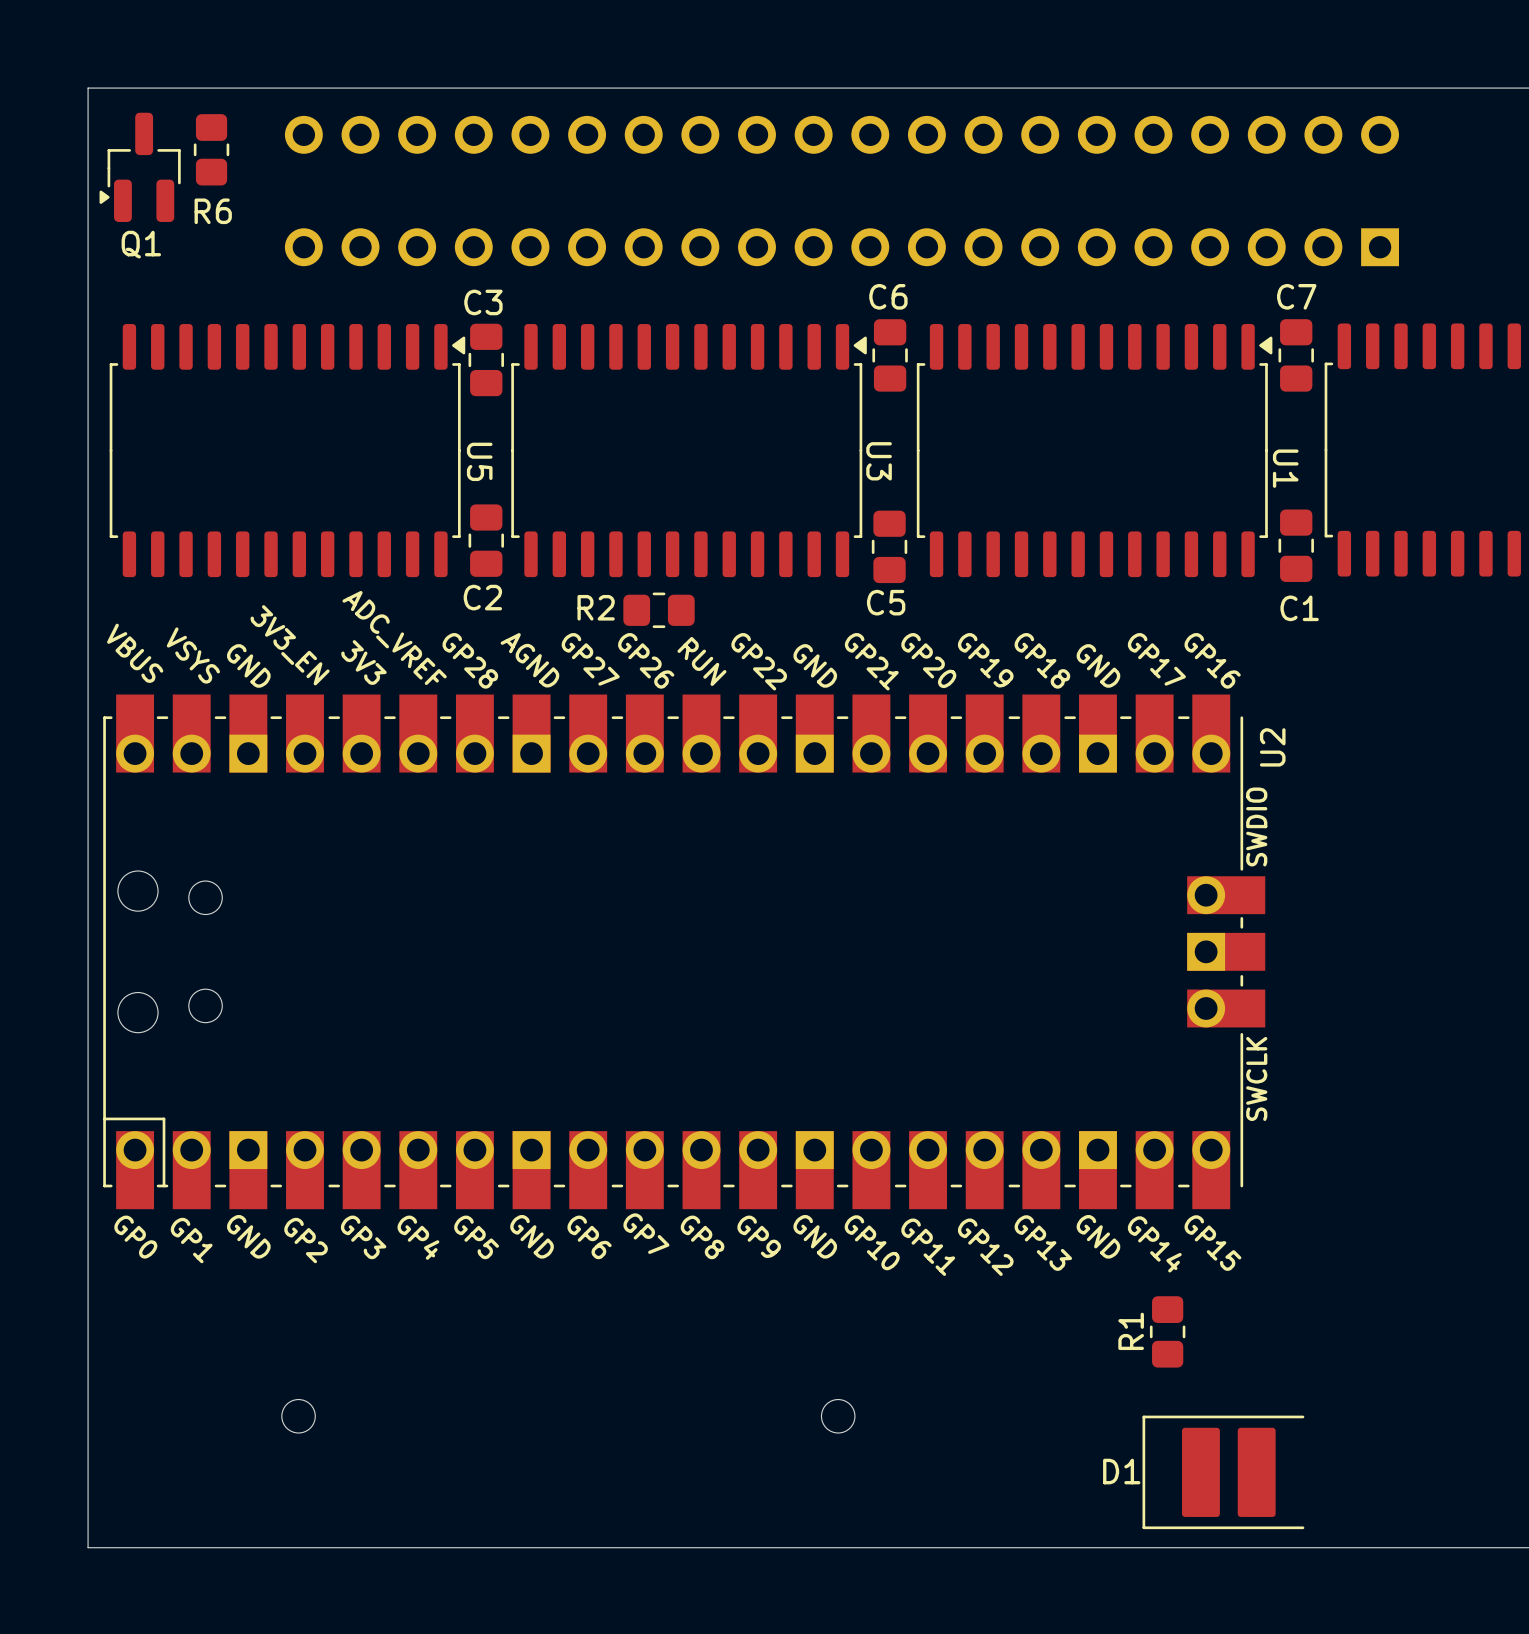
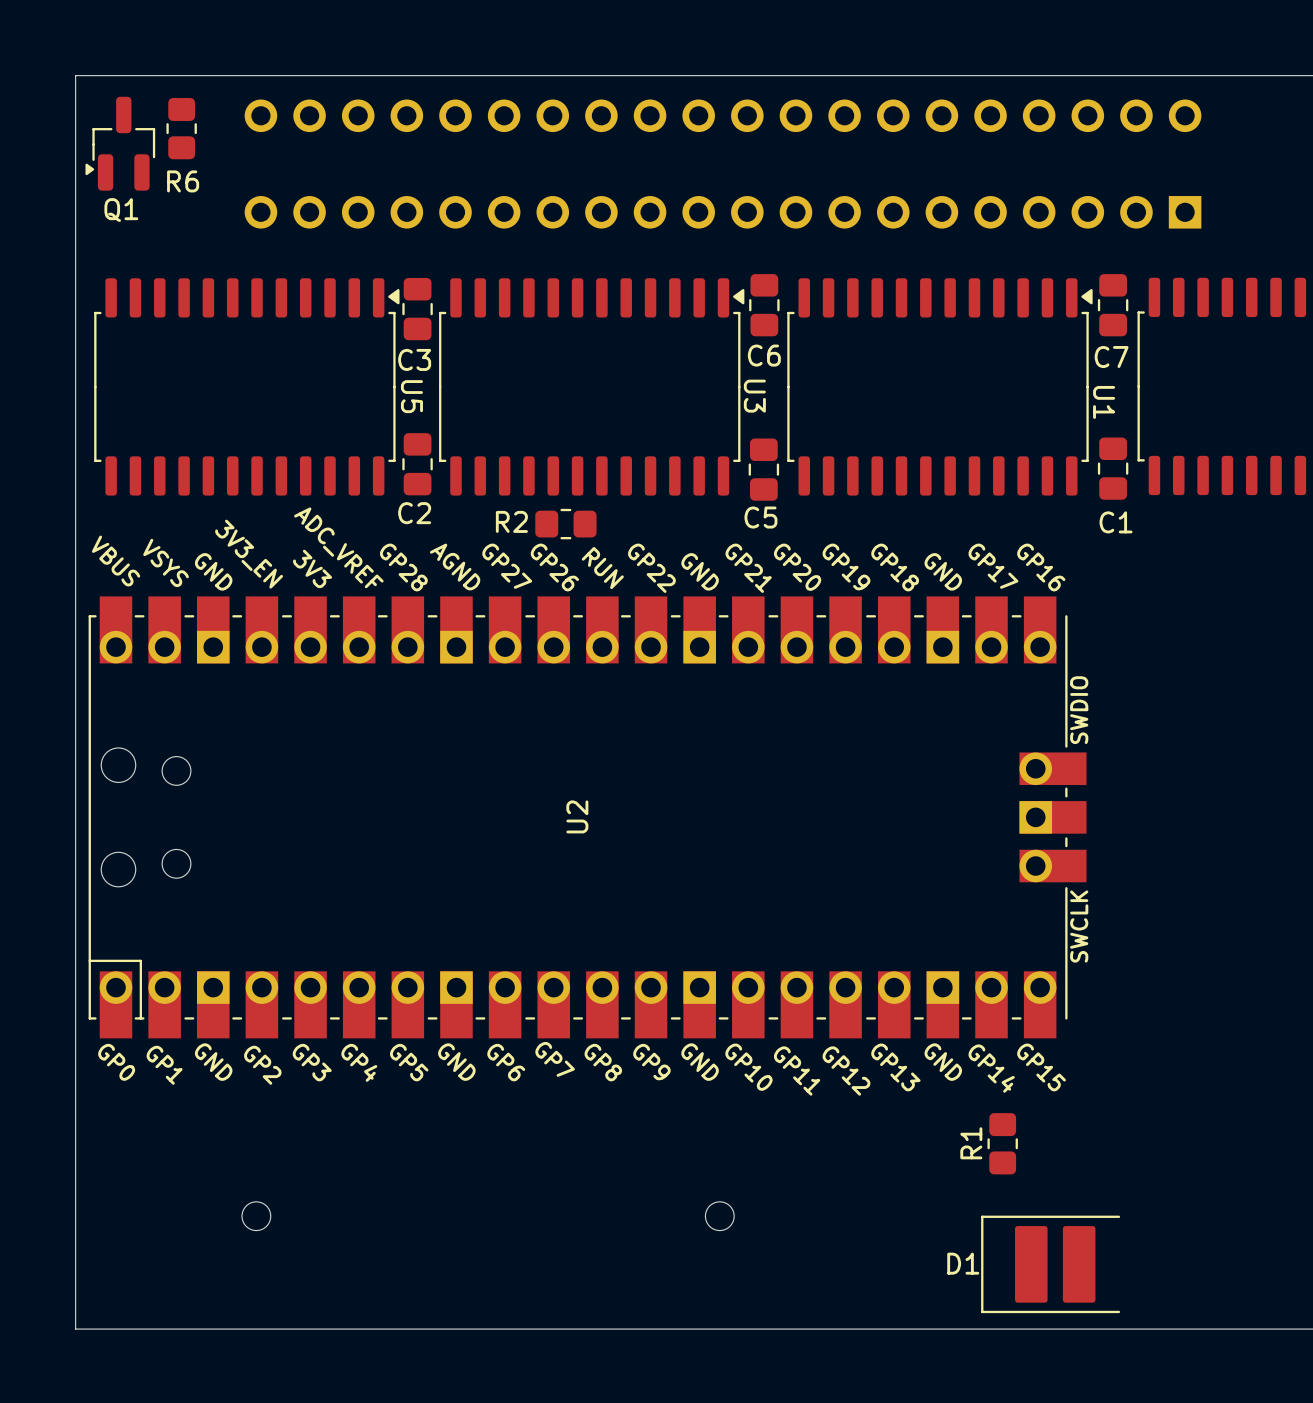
C6 name position: C6 (888, 296) -> C6 (764, 355)
C7 name position: C7 (1296, 296) -> C7 (1111, 357)
C3 name position: C3 (483, 302) -> C3 (414, 359)
U2 name position: U2 (1272, 747) -> U2 (577, 816)

